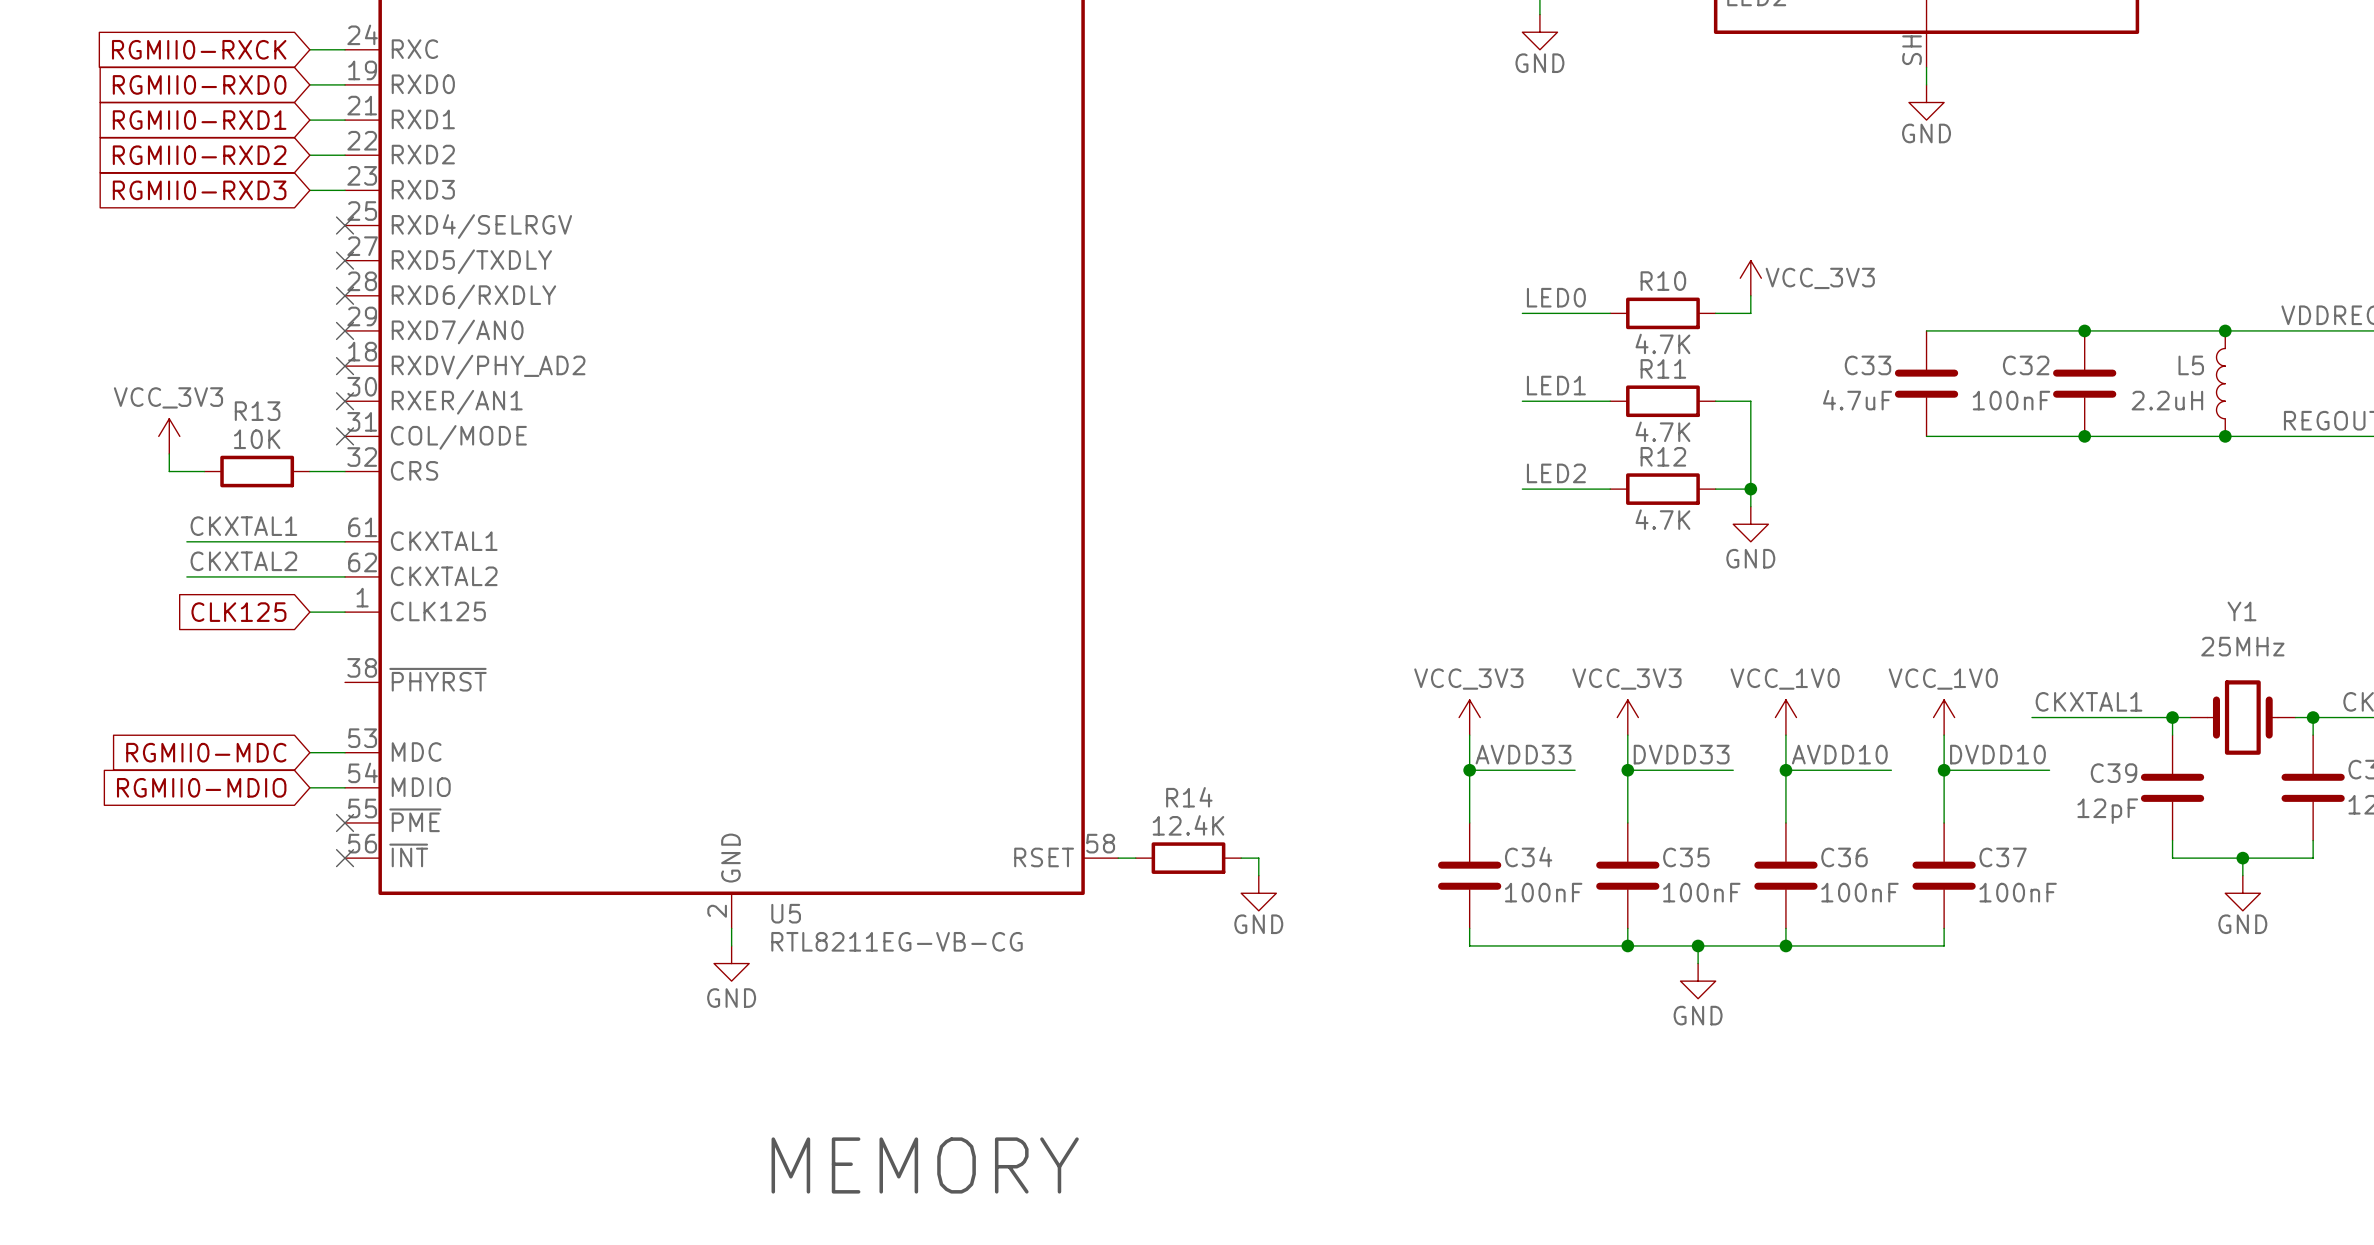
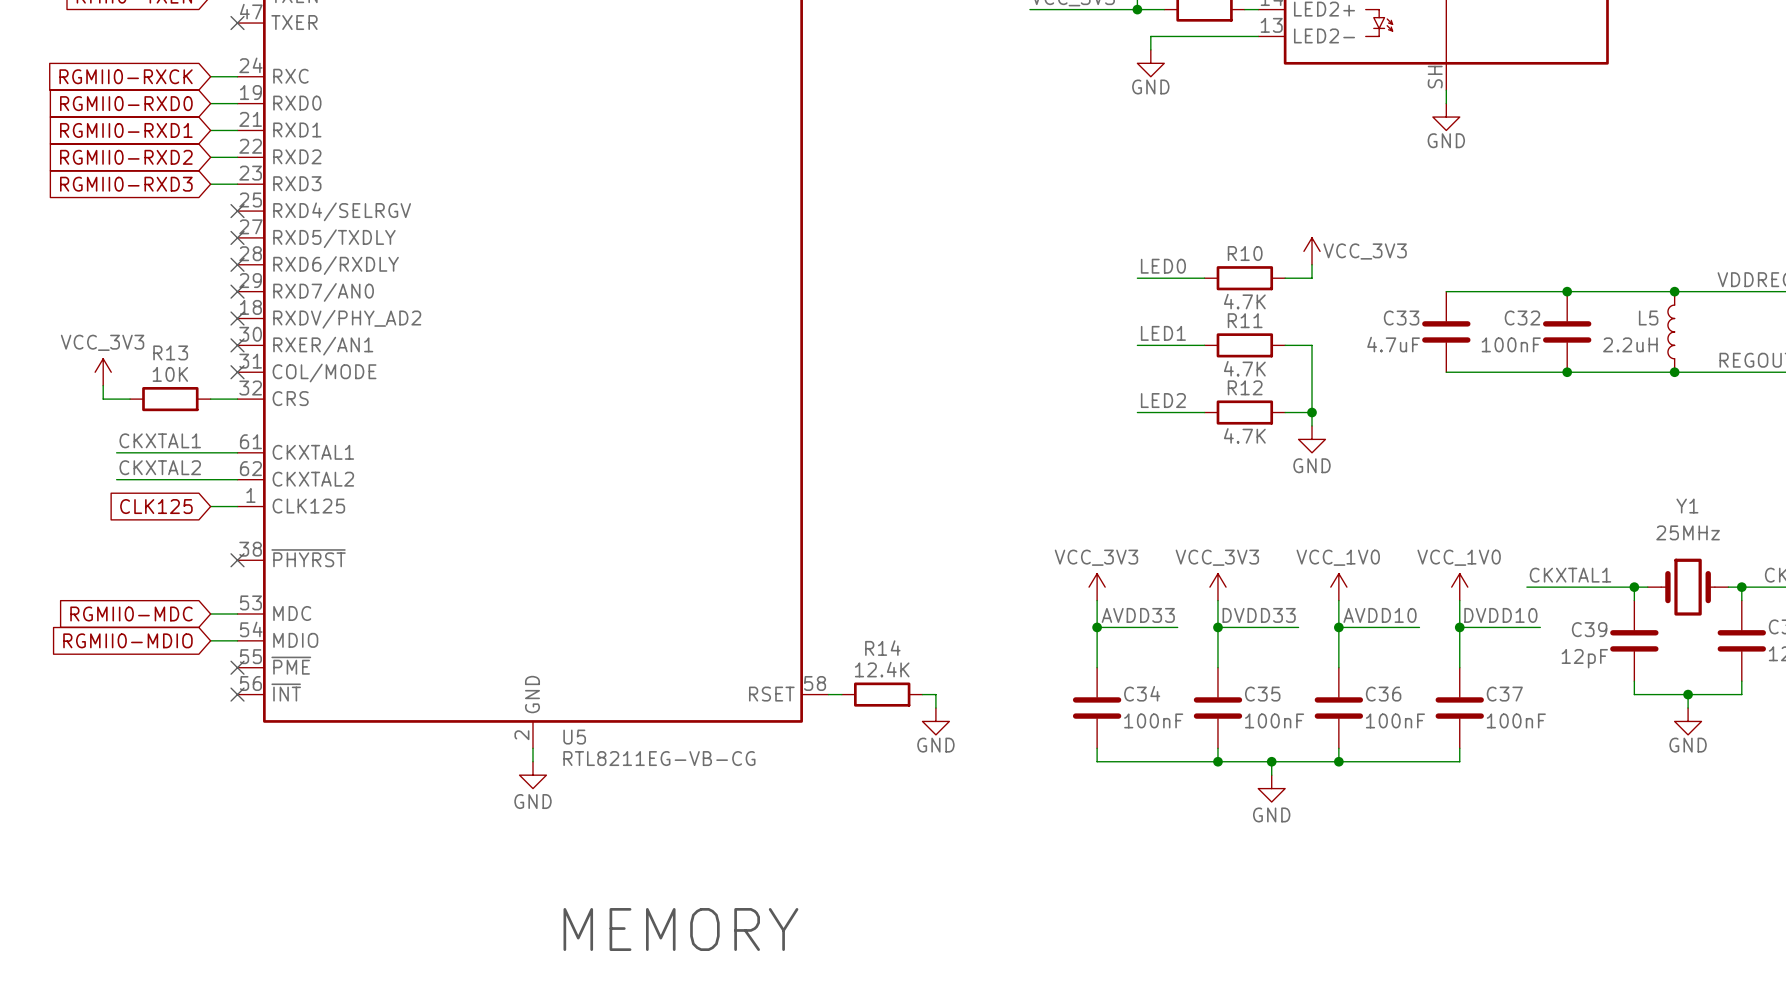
no-connect mark: none -> (237, 560)

